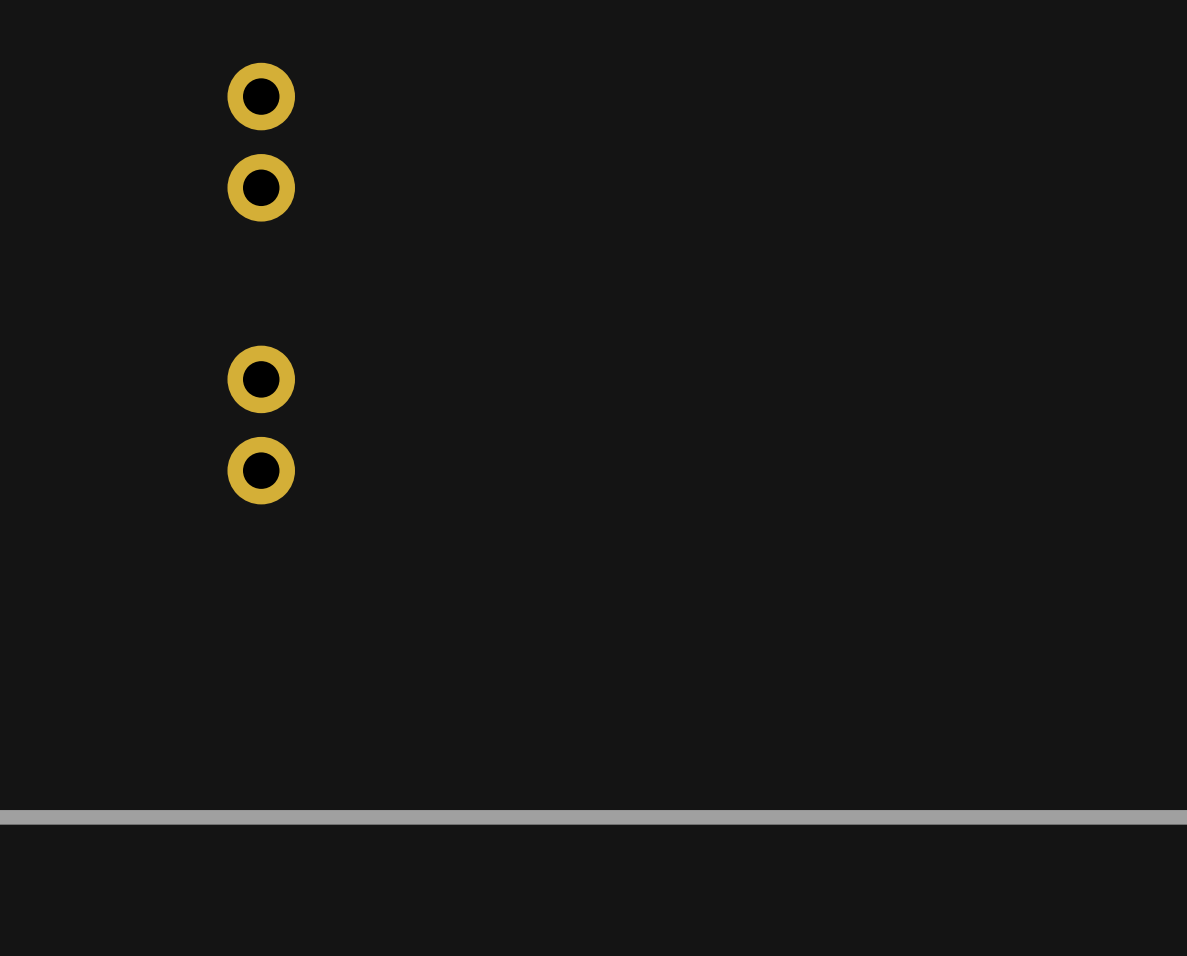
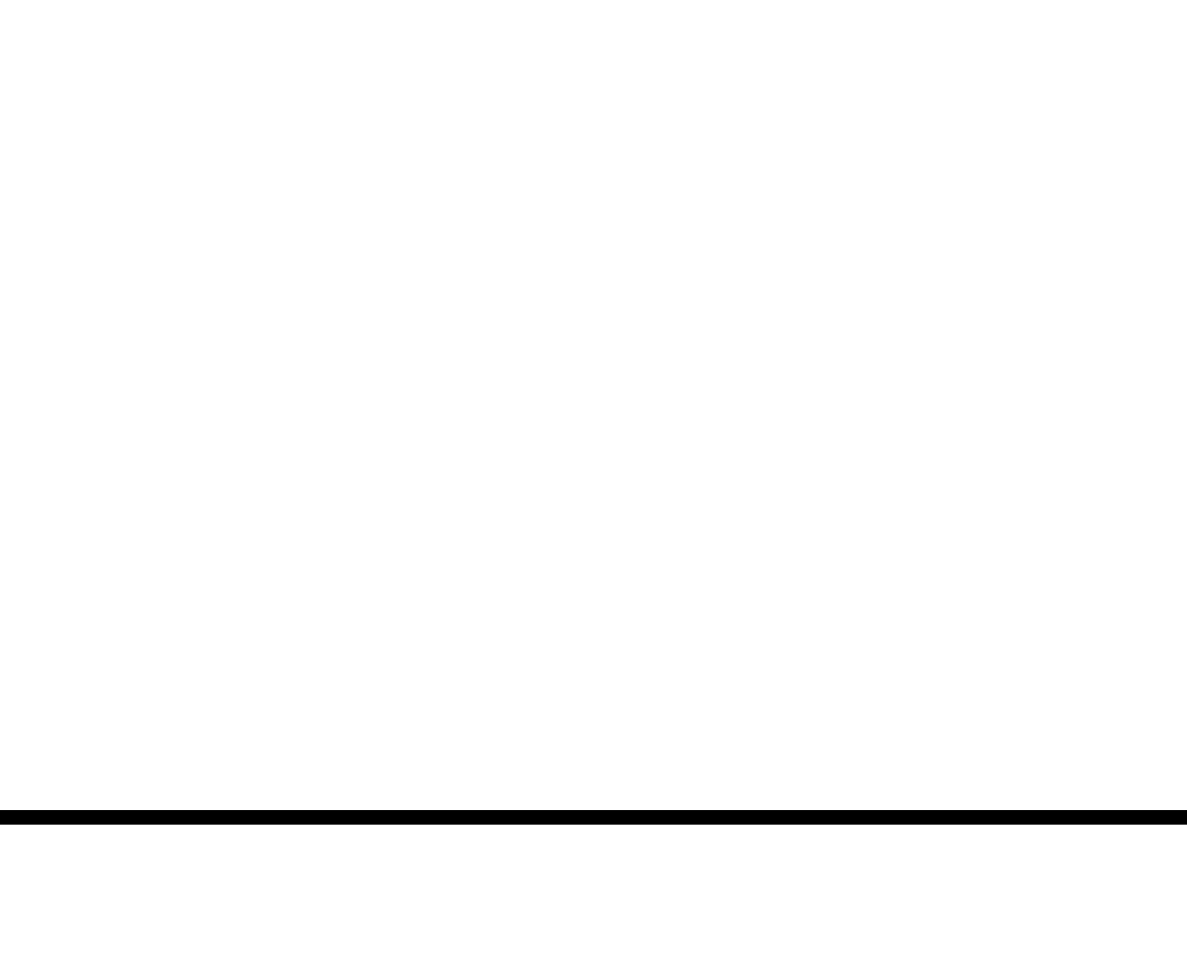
part: (261, 142) -> none
part: (261, 425) -> none

